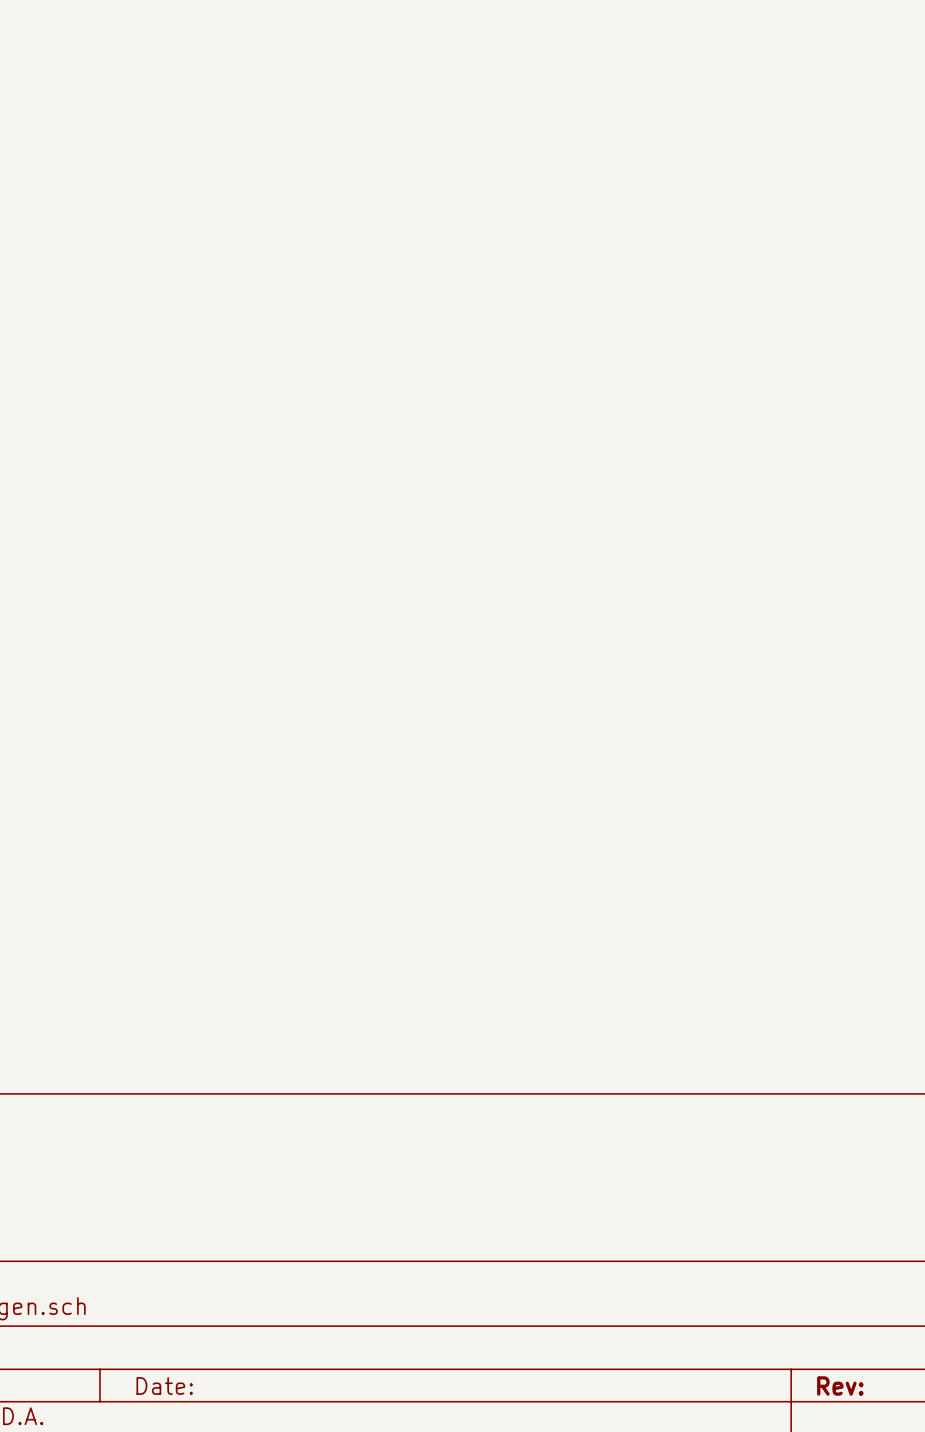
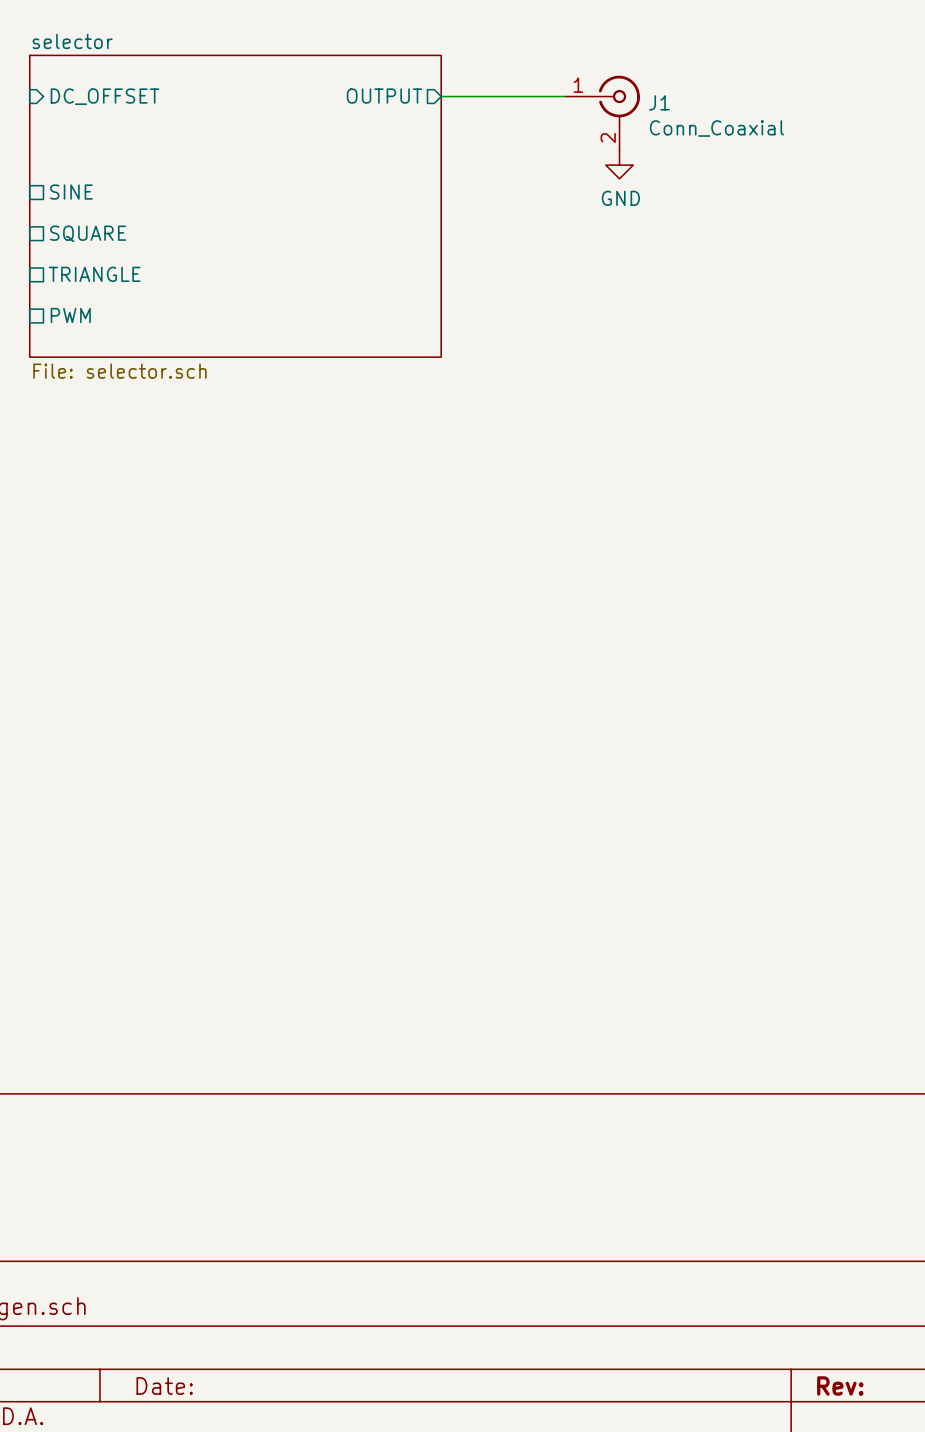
sheet pin: none -> DC_OFFSET (105, 96)
sheet pin: none -> OUTPUT (384, 96)
wire: none -> (441, 96) (564, 96)
J1: none -> Conn_Coaxial (602, 113)
power symbol: none -> GND (619, 165)
sheet pin: none -> SINE (71, 192)
sheet selector: none -> File: selector.sch (235, 206)
sheet pin: none -> SQUARE (88, 233)
sheet pin: none -> TRIANGLE (94, 274)
sheet pin: none -> PWM (70, 315)

